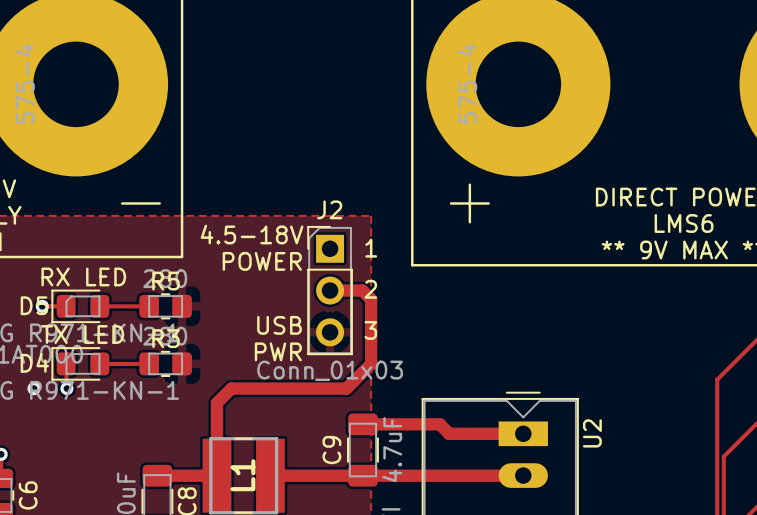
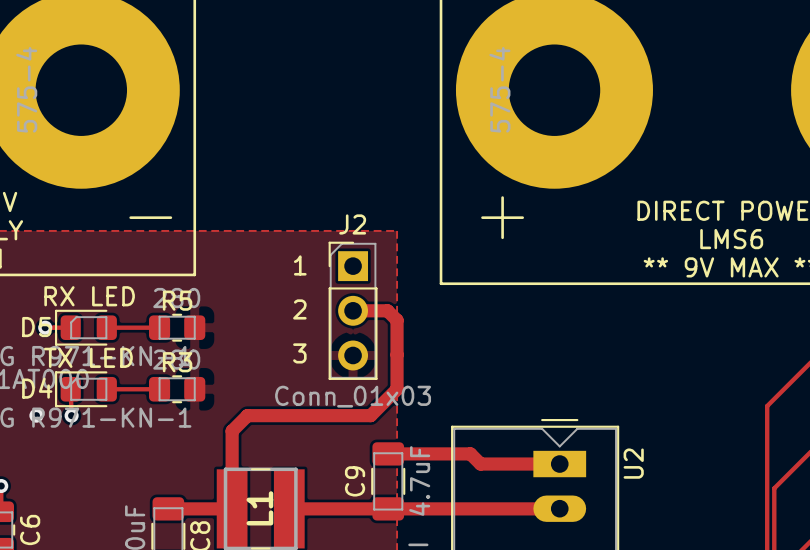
text: 4.5-18V (252, 234) -> none
text position: 1 (371, 248) -> 1 (300, 265)
text: POWER (262, 261) -> none
text position: 2 (370, 289) -> 2 (299, 309)
text: USB (279, 325) -> none
text position: 3 (370, 330) -> 3 (299, 353)
text: PWR (278, 351) -> none

